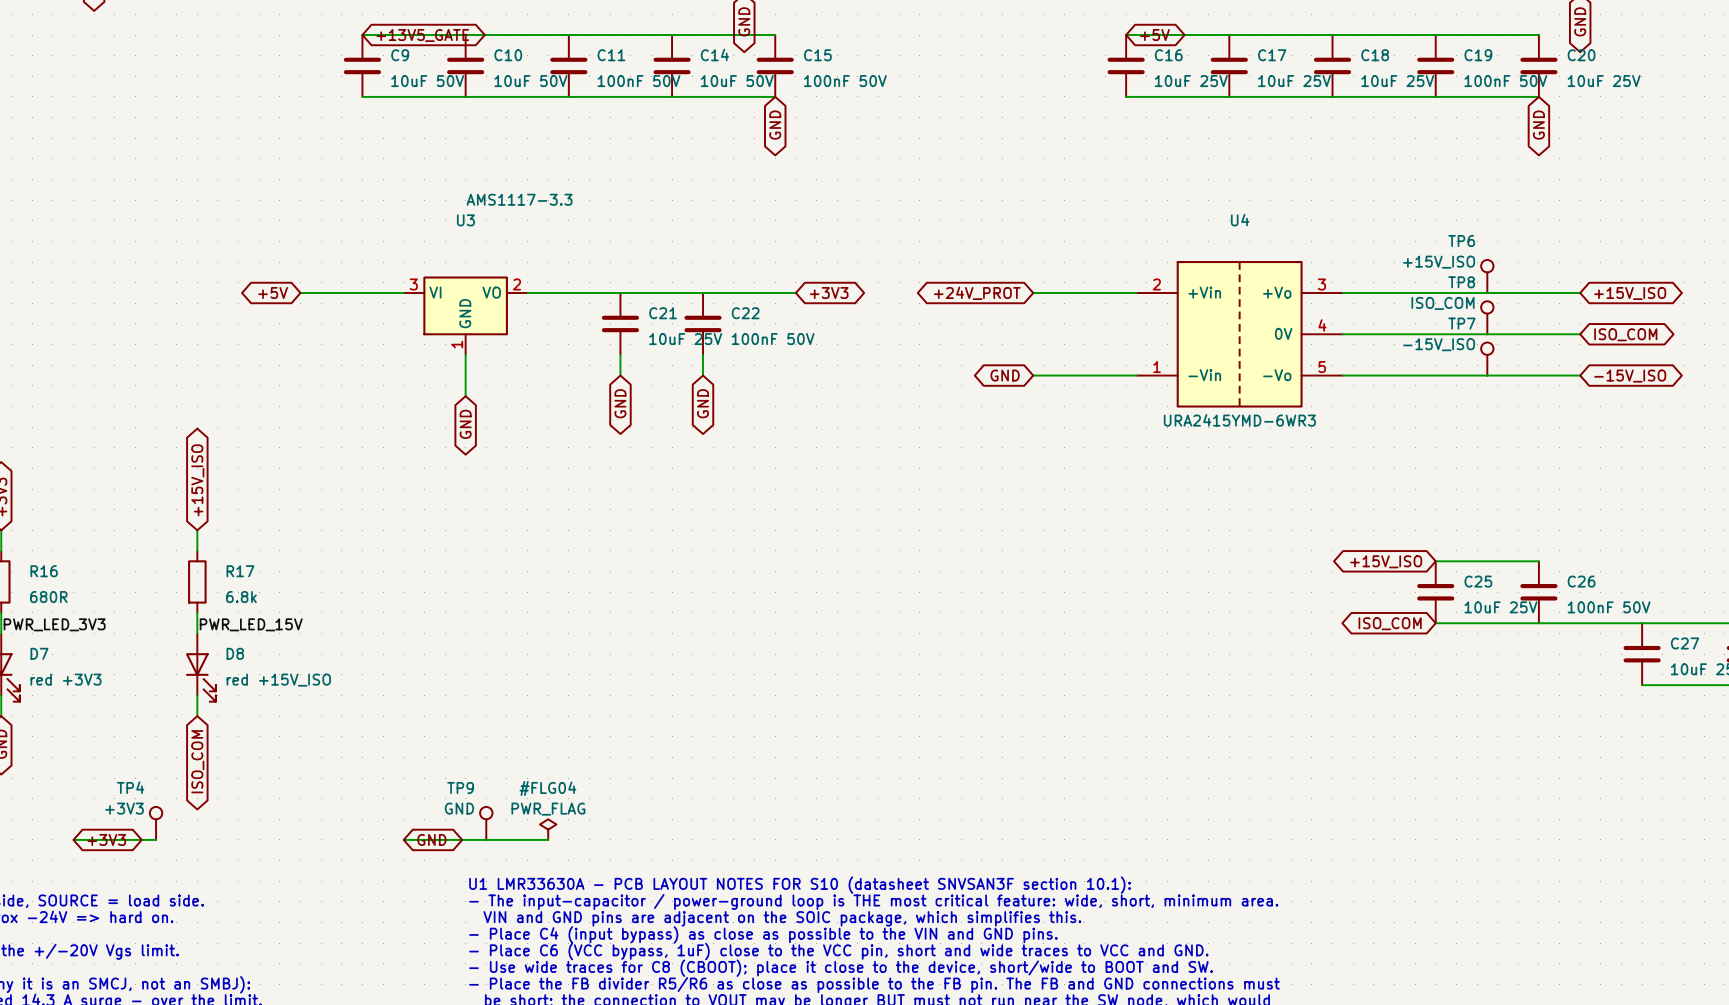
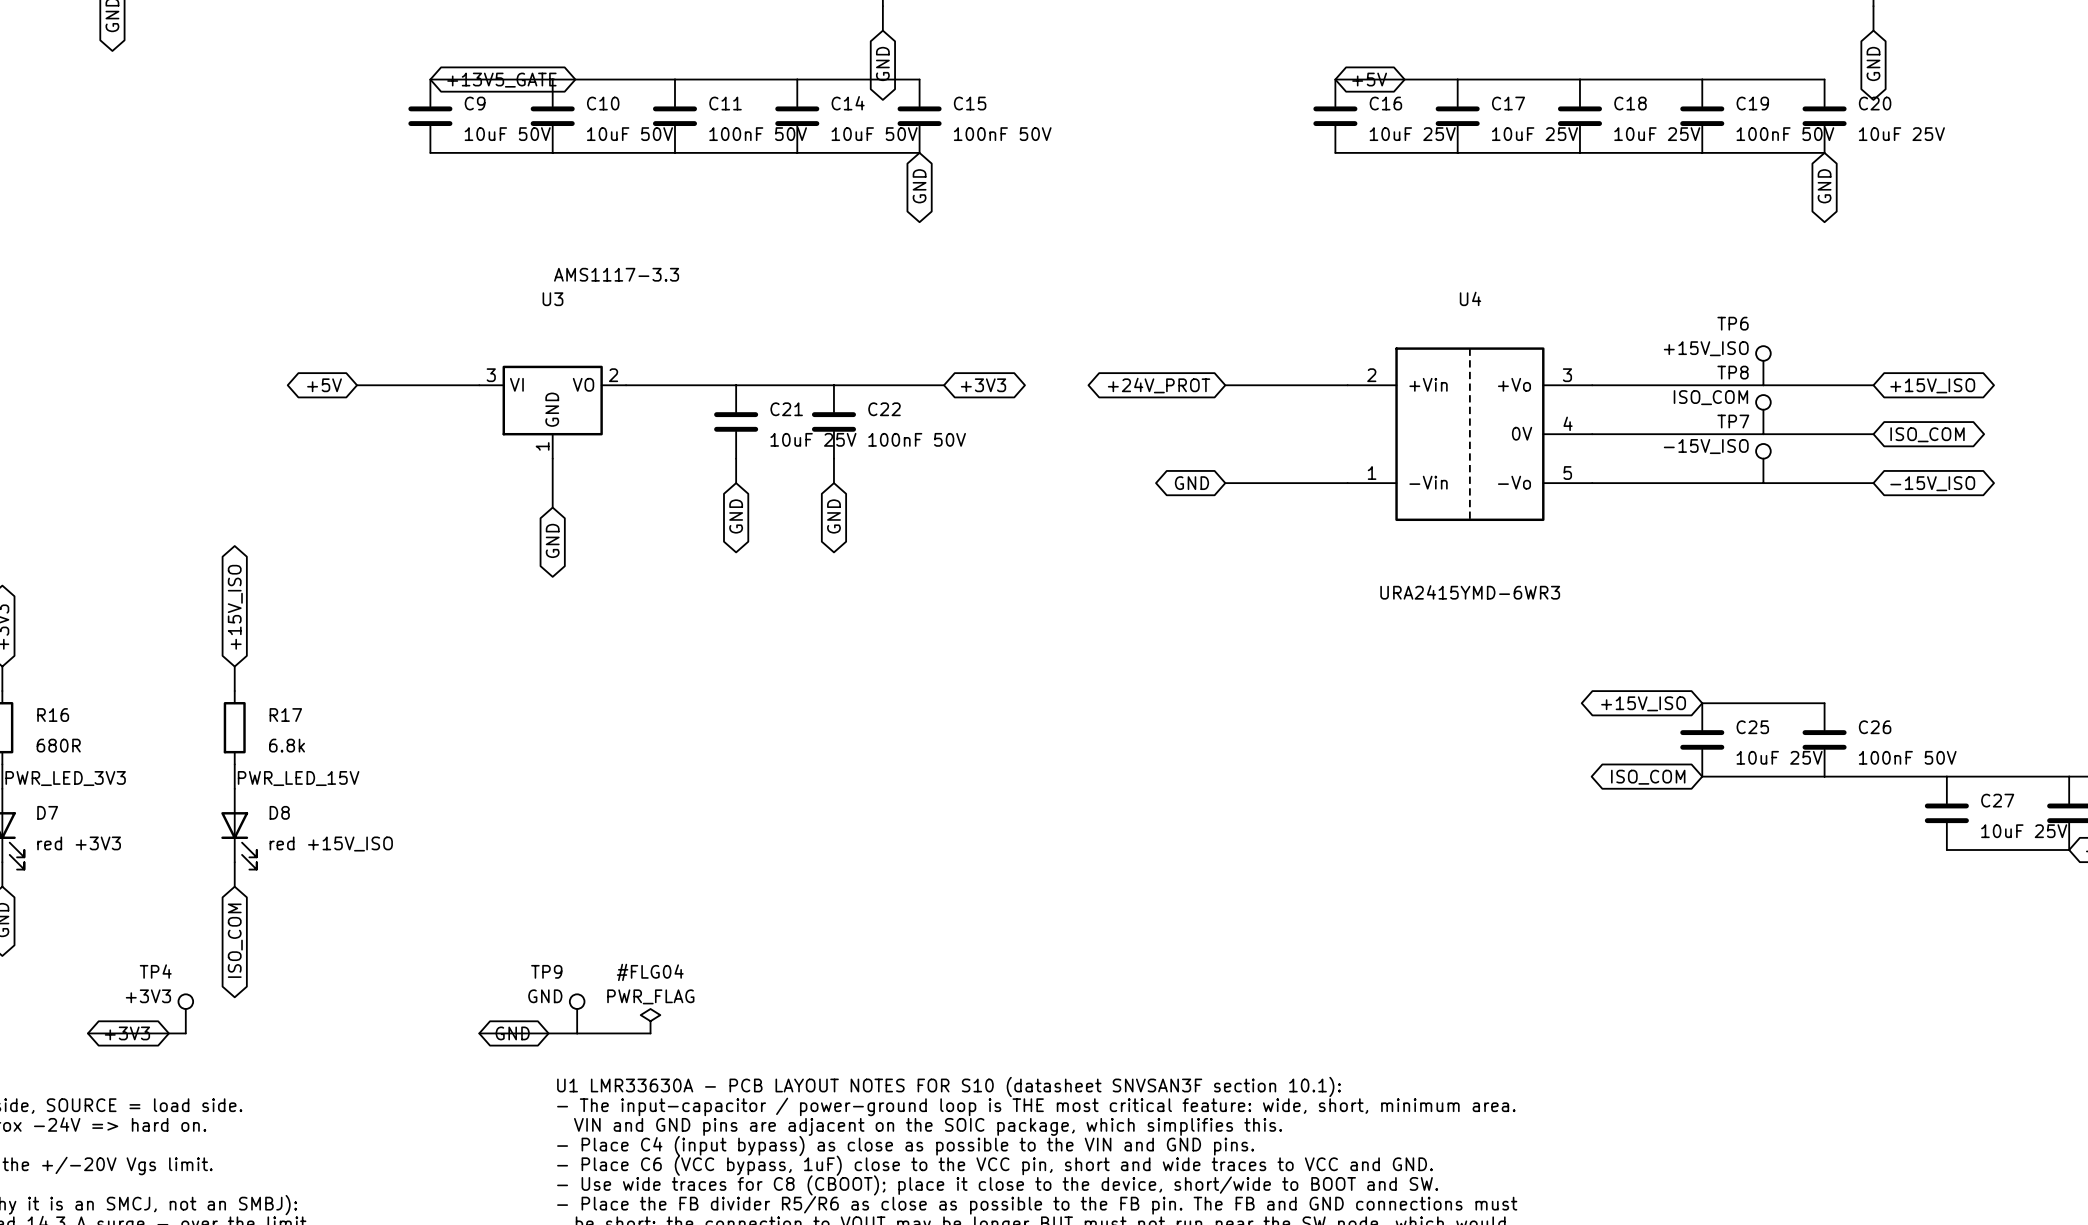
U4 value position: URA2415YMD-6WR3 (1239, 420) -> URA2415YMD-6WR3 (1470, 592)

